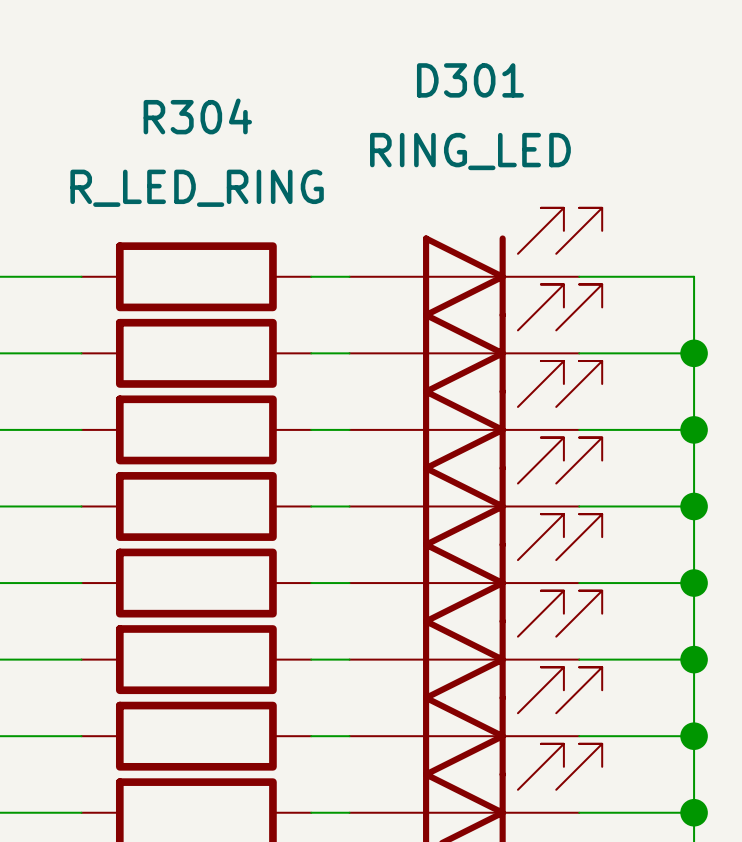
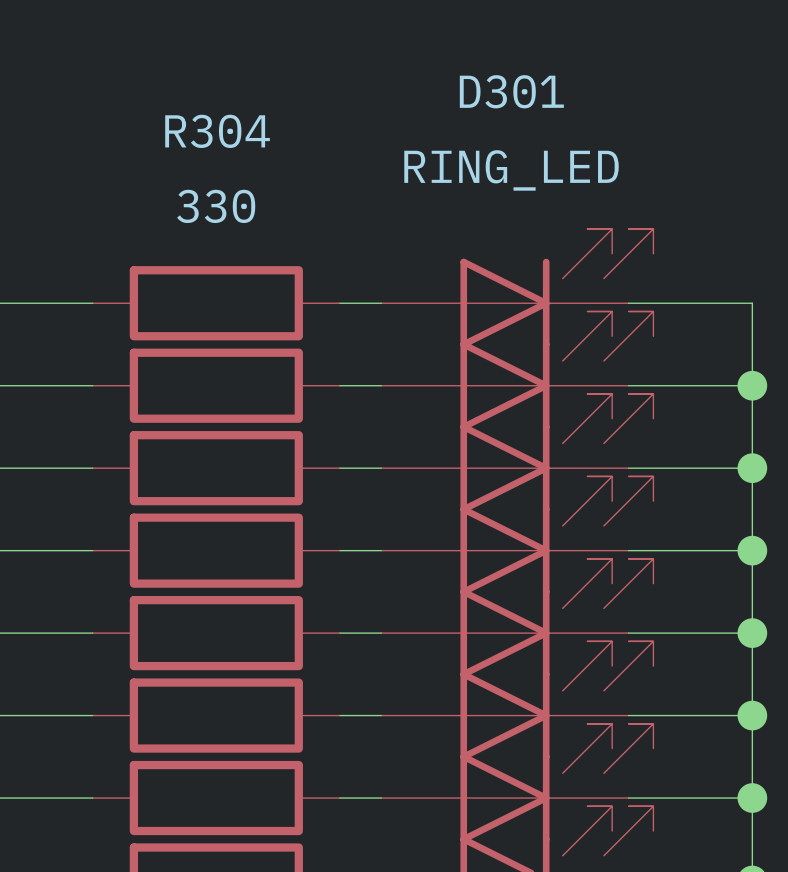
R304 value: R_LED_RING (197, 188) -> 330 (216, 206)

